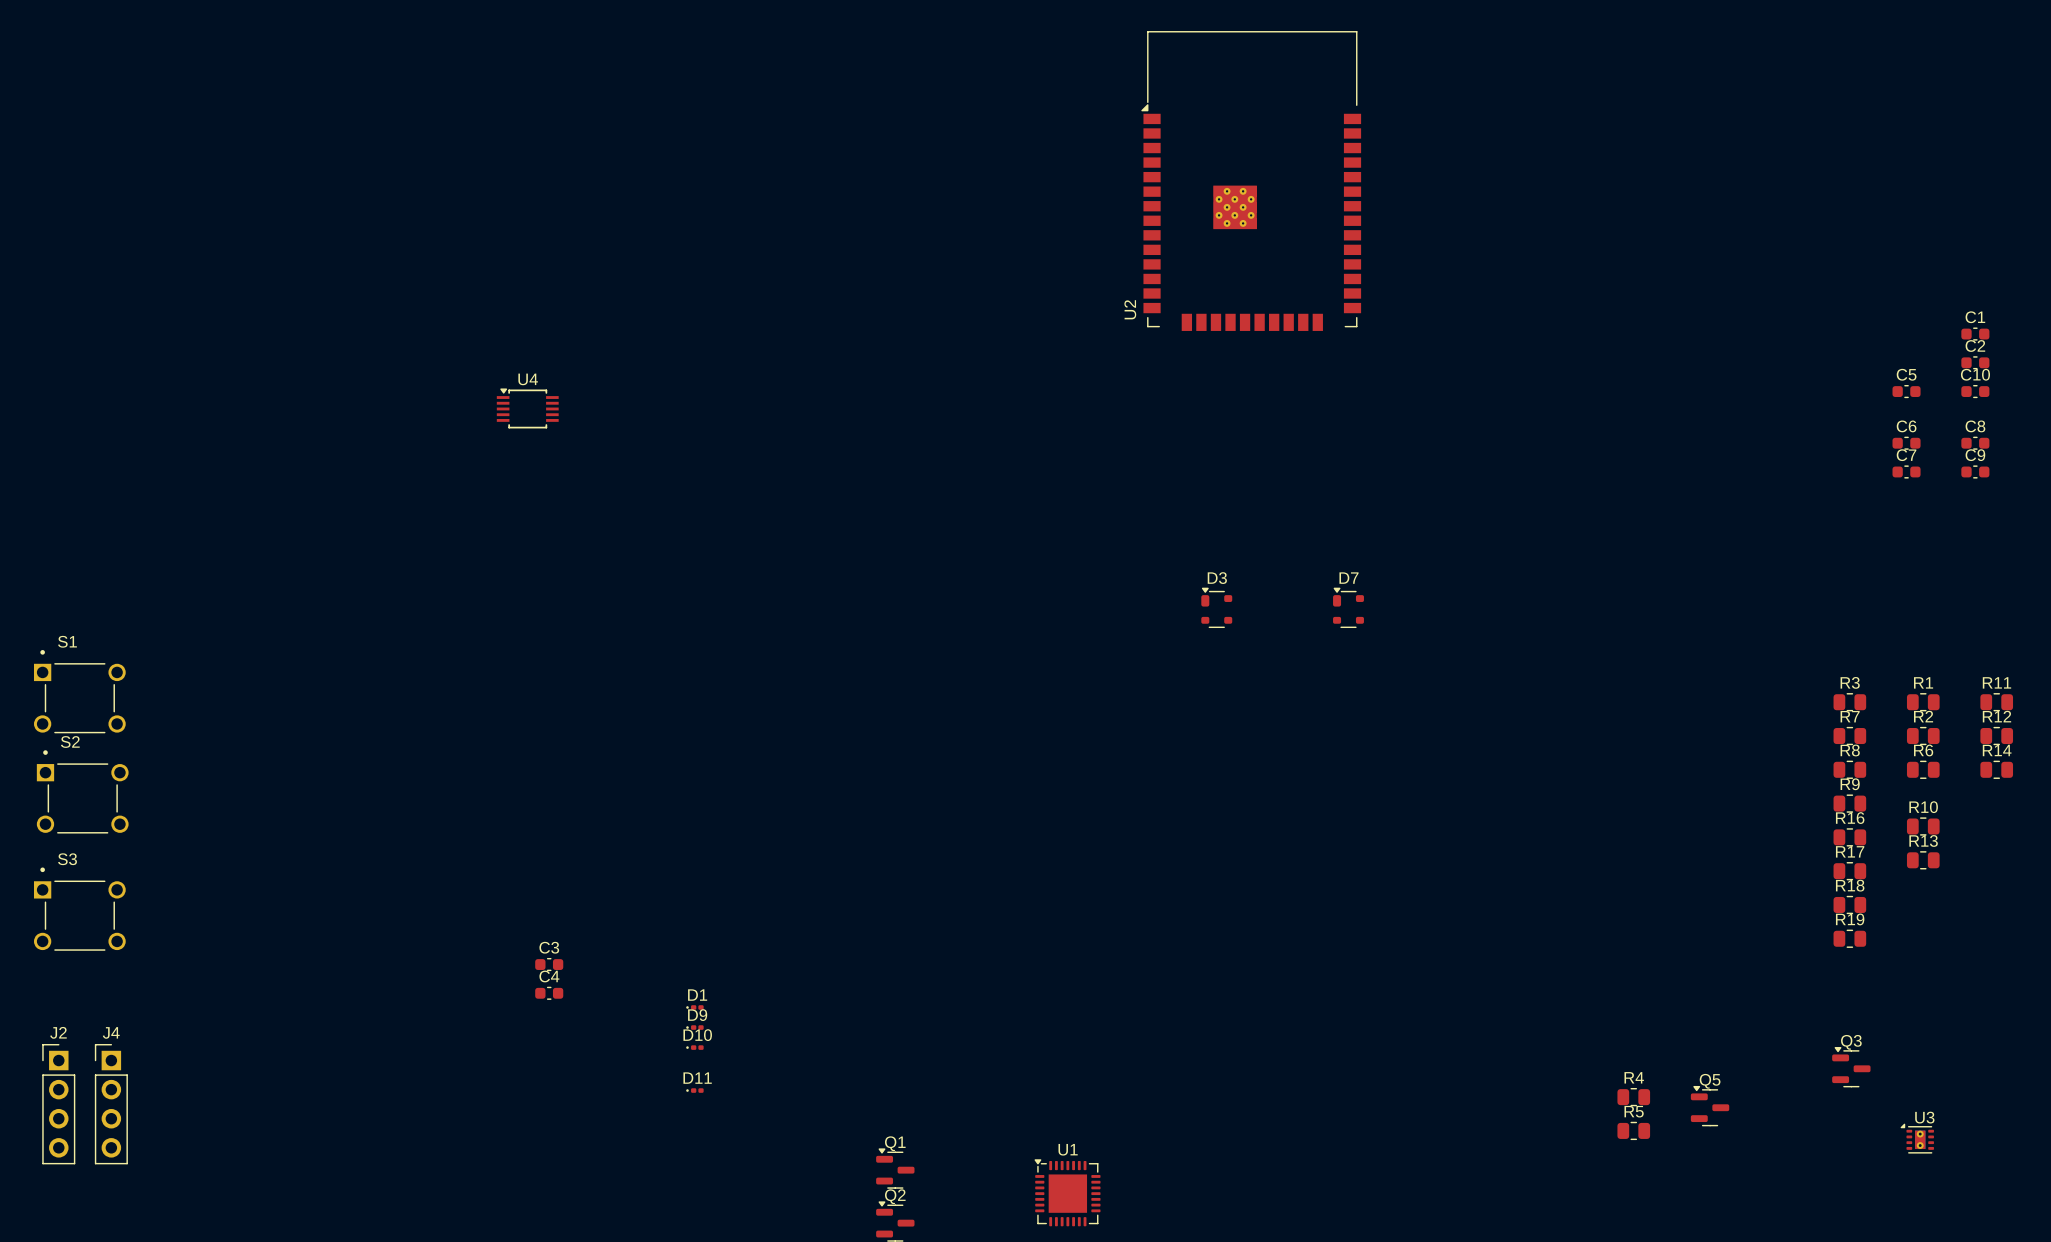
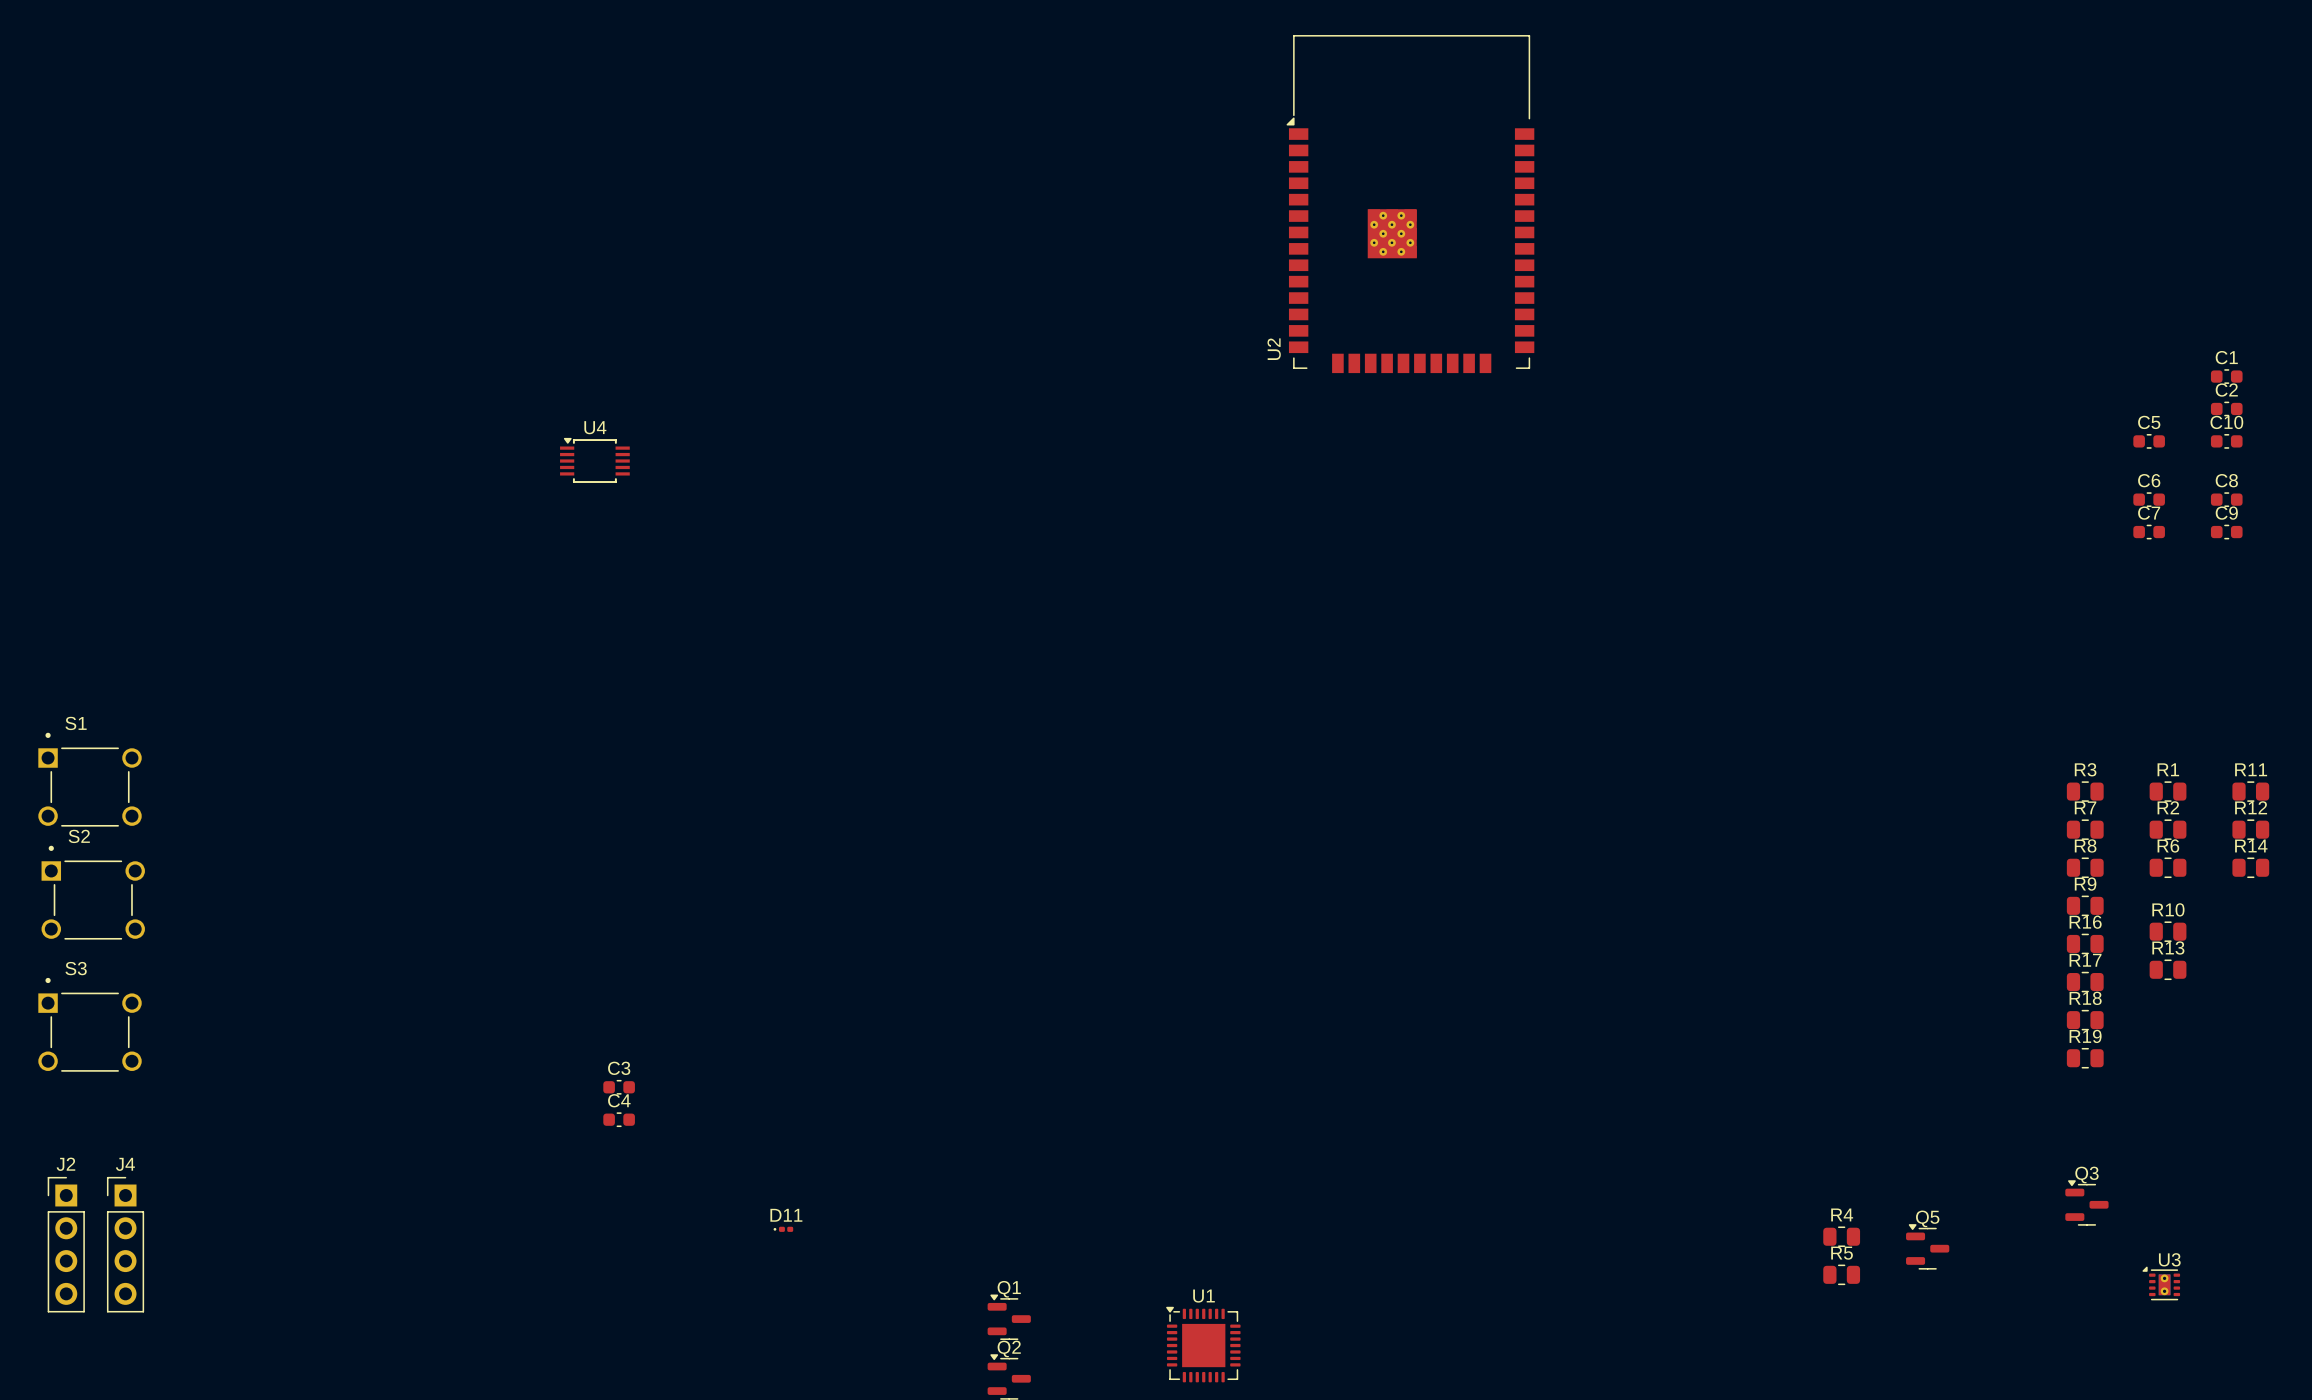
D3: (1216, 607) -> none
D7: (1348, 607) -> none
D1: (694, 1007) -> none
D9: (694, 1027) -> none
D10: (694, 1047) -> none

